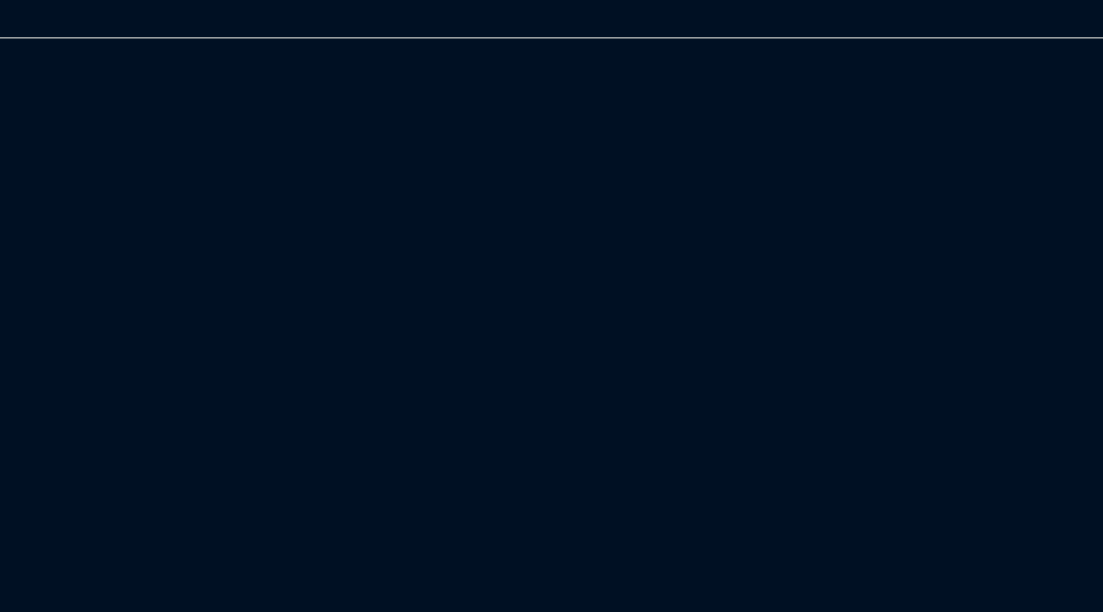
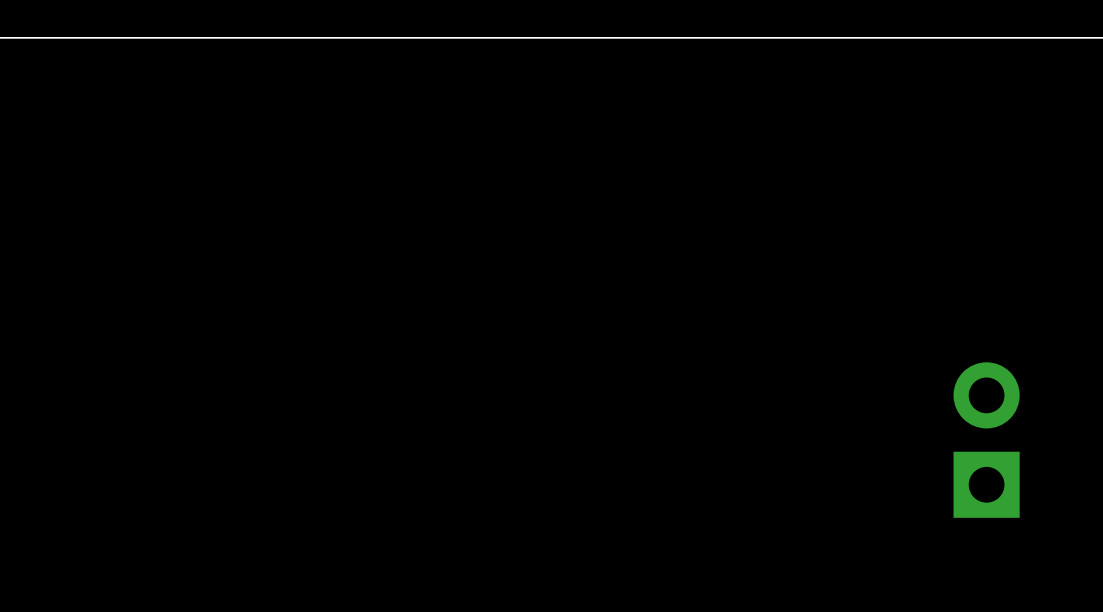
part: none -> (986, 440)

